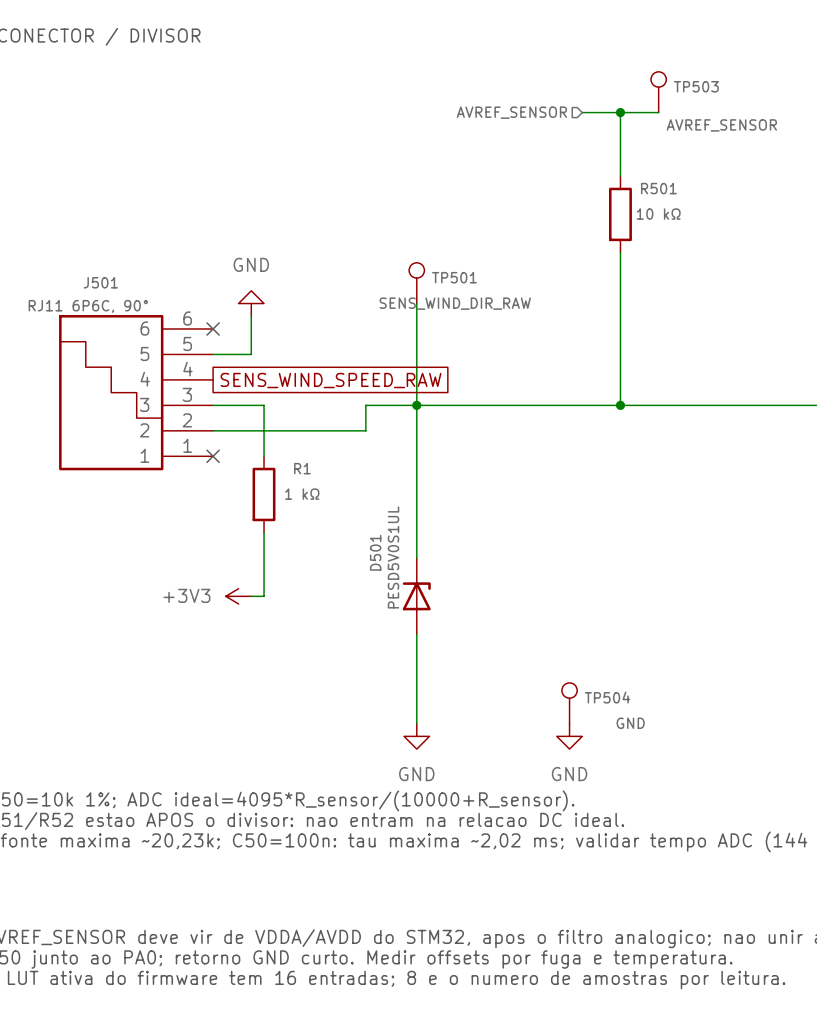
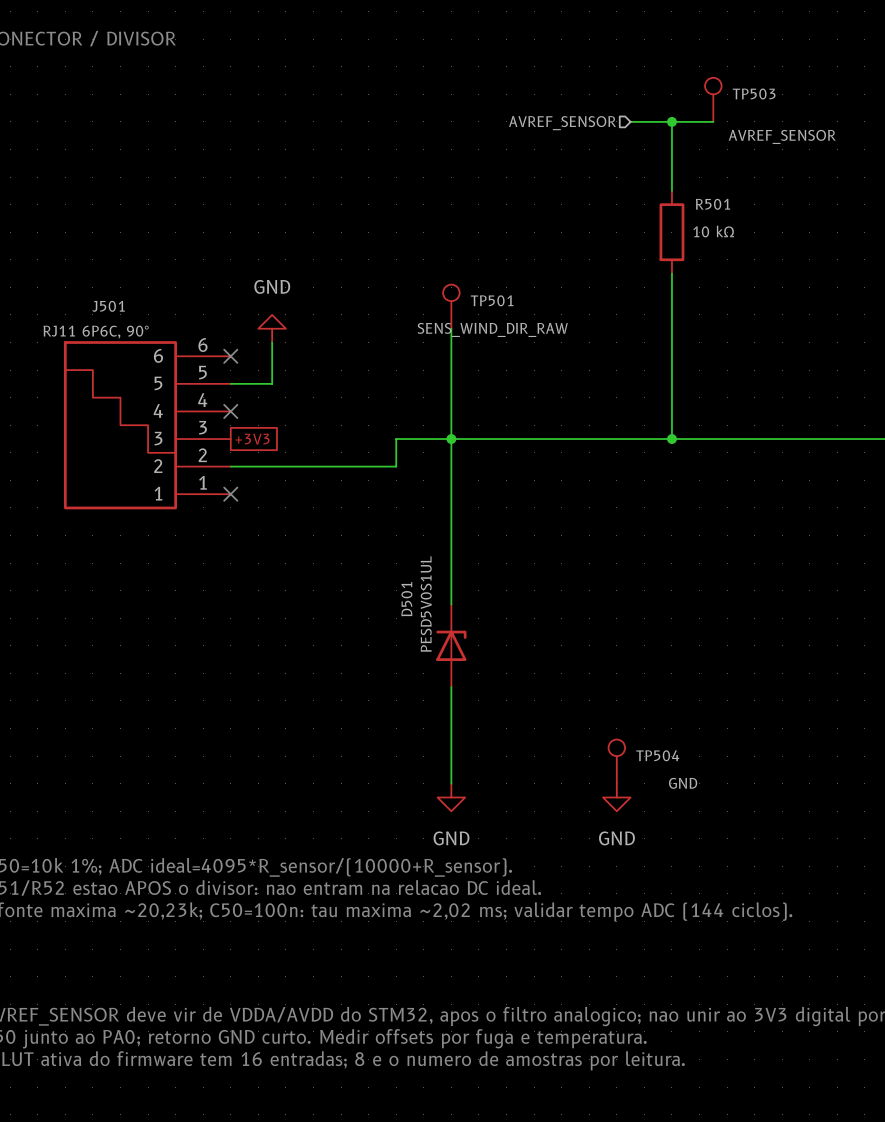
no-connect mark: none -> (230, 411)
global label: SENS_WIND_SPEED_RAW (331, 380) -> none
wire: (213, 405) (264, 405) (264, 456) -> none
global label: none -> +3V3 (252, 439)
R1: 1 kΩ (264, 494) -> none
wire: (264, 532) (264, 596) (251, 596) -> none
power symbol: +3V3 (238, 596) -> none

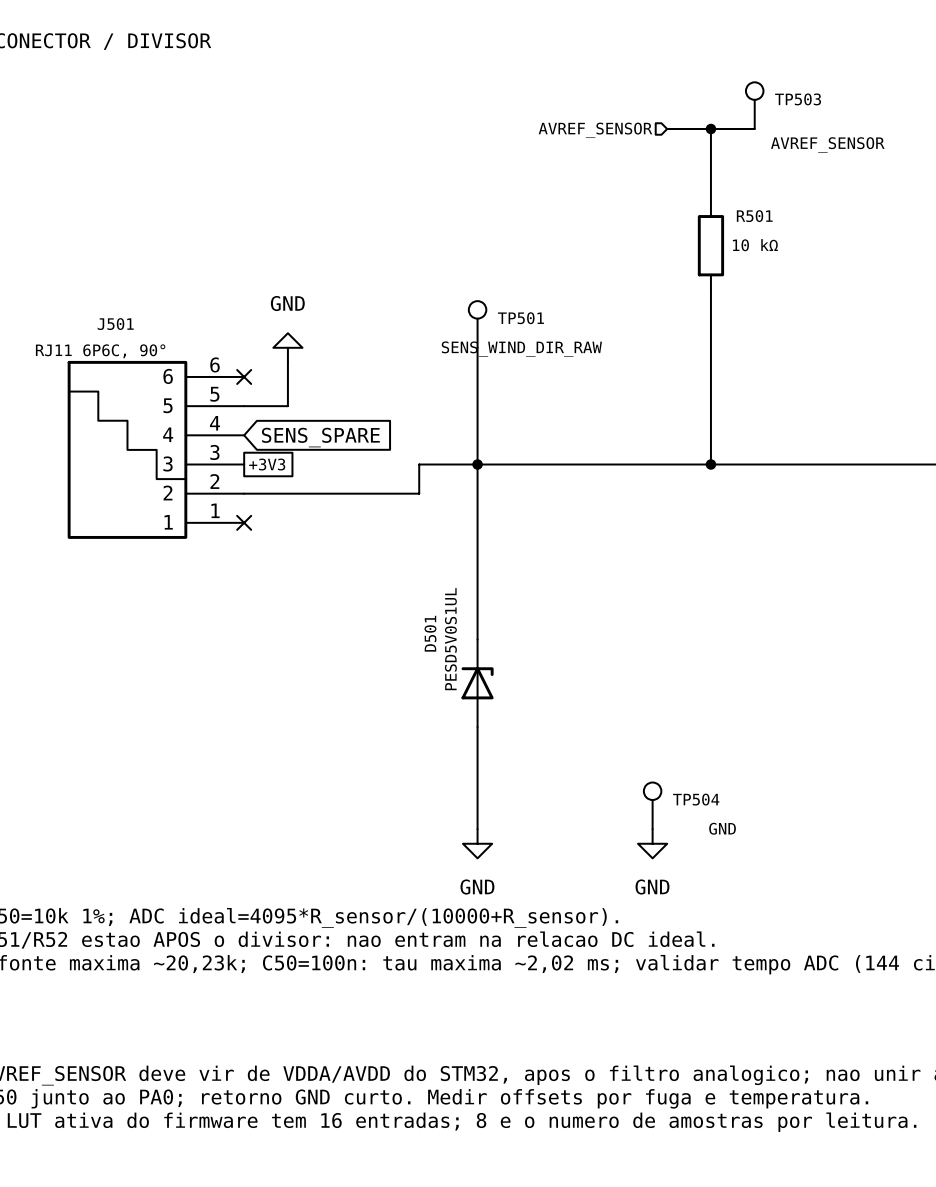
no-connect mark: (230, 411) -> none
global label: none -> SENS_SPARE (320, 437)

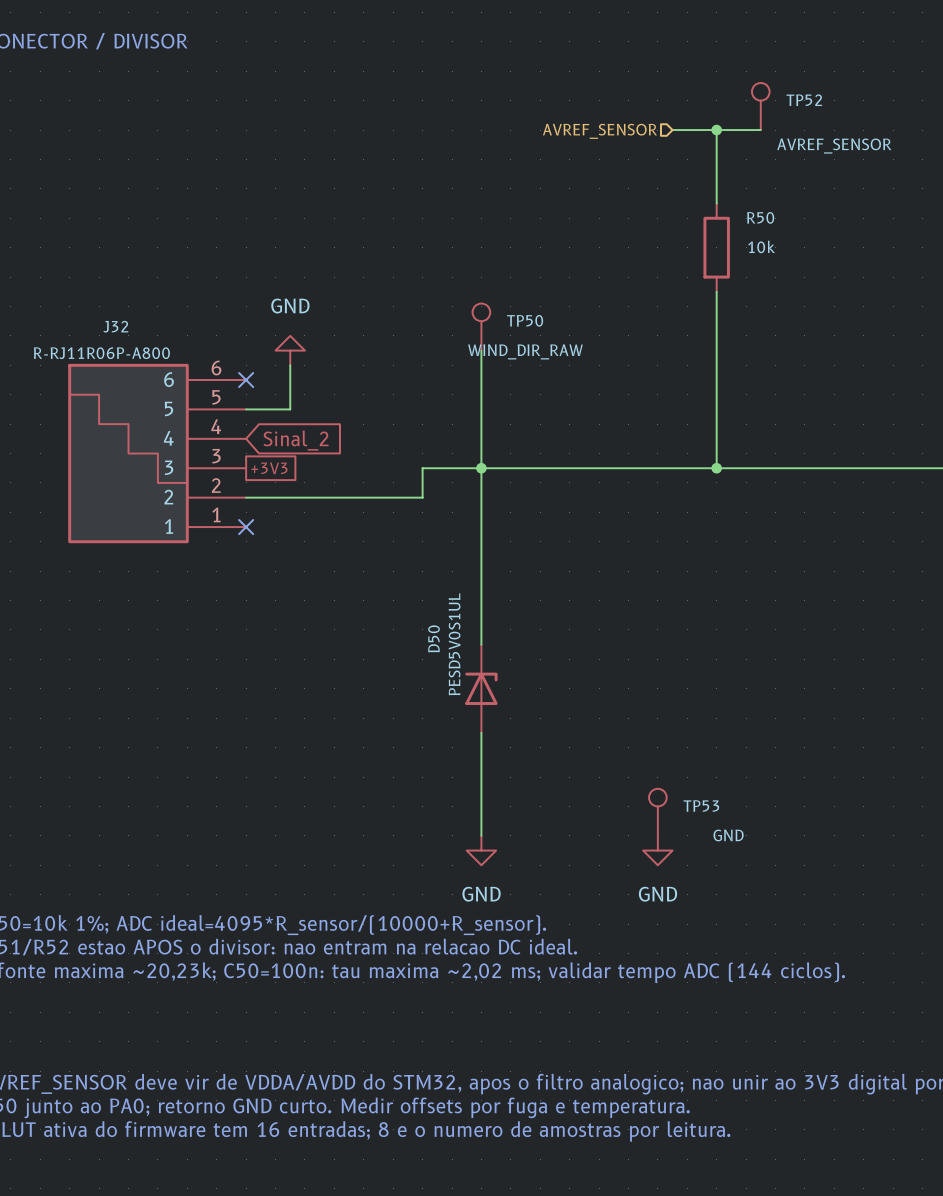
TP503 name: TP503 (798, 99) -> TP52 (804, 100)
R501 name: R501 (754, 216) -> R50 (760, 217)
R501 value: 10 kΩ (755, 245) -> 10k (761, 246)
TP501 name: TP501 (520, 318) -> TP50 (525, 320)
J501 name: J501 (115, 324) -> J32 (115, 326)
TP501 value: SENS_WIND_DIR_RAW (521, 349) -> WIND_DIR_RAW (525, 351)
J501 value: RJ11 6P6C, 90° (100, 351) -> R-RJ11R06P-A800 (101, 353)
global label: SENS_SPARE (320, 437) -> Sinal_2 (296, 440)
D501 name: D501 (430, 633) -> D50 (434, 638)
TP504 name: TP504 (696, 799) -> TP53 (701, 806)

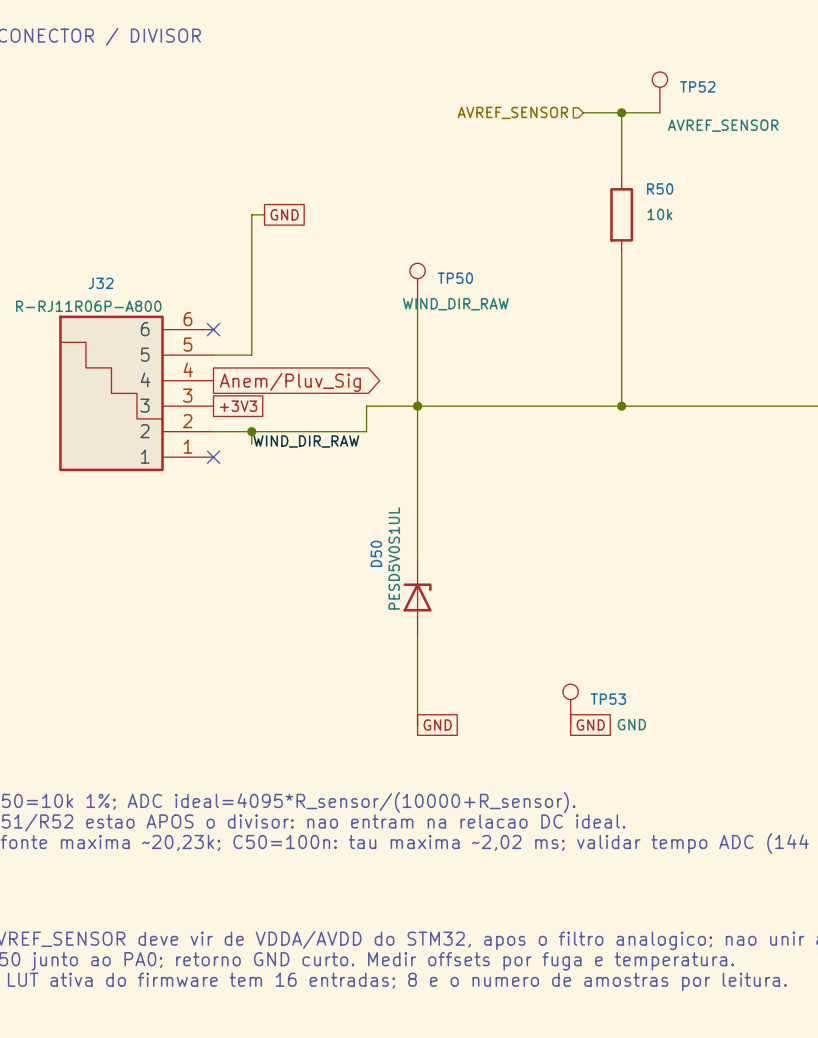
wire: none -> (264, 214) (251, 214) (251, 316)
global label: none -> GND (284, 214)
power symbol: GND (290, 350) -> none
global label shape: input (296, 440) -> output (290, 382)
global label: Sinal_2 (296, 440) -> Anem/Pluv_Sig (290, 382)
wire: none -> (251, 431) (251, 444)
junction: none -> (251, 431)
label: none -> WIND_DIR_RAW (306, 441)
global label: none -> GND (437, 725)
global label: none -> GND (590, 725)
power symbol: GND (481, 850) -> none
power symbol: GND (657, 850) -> none

